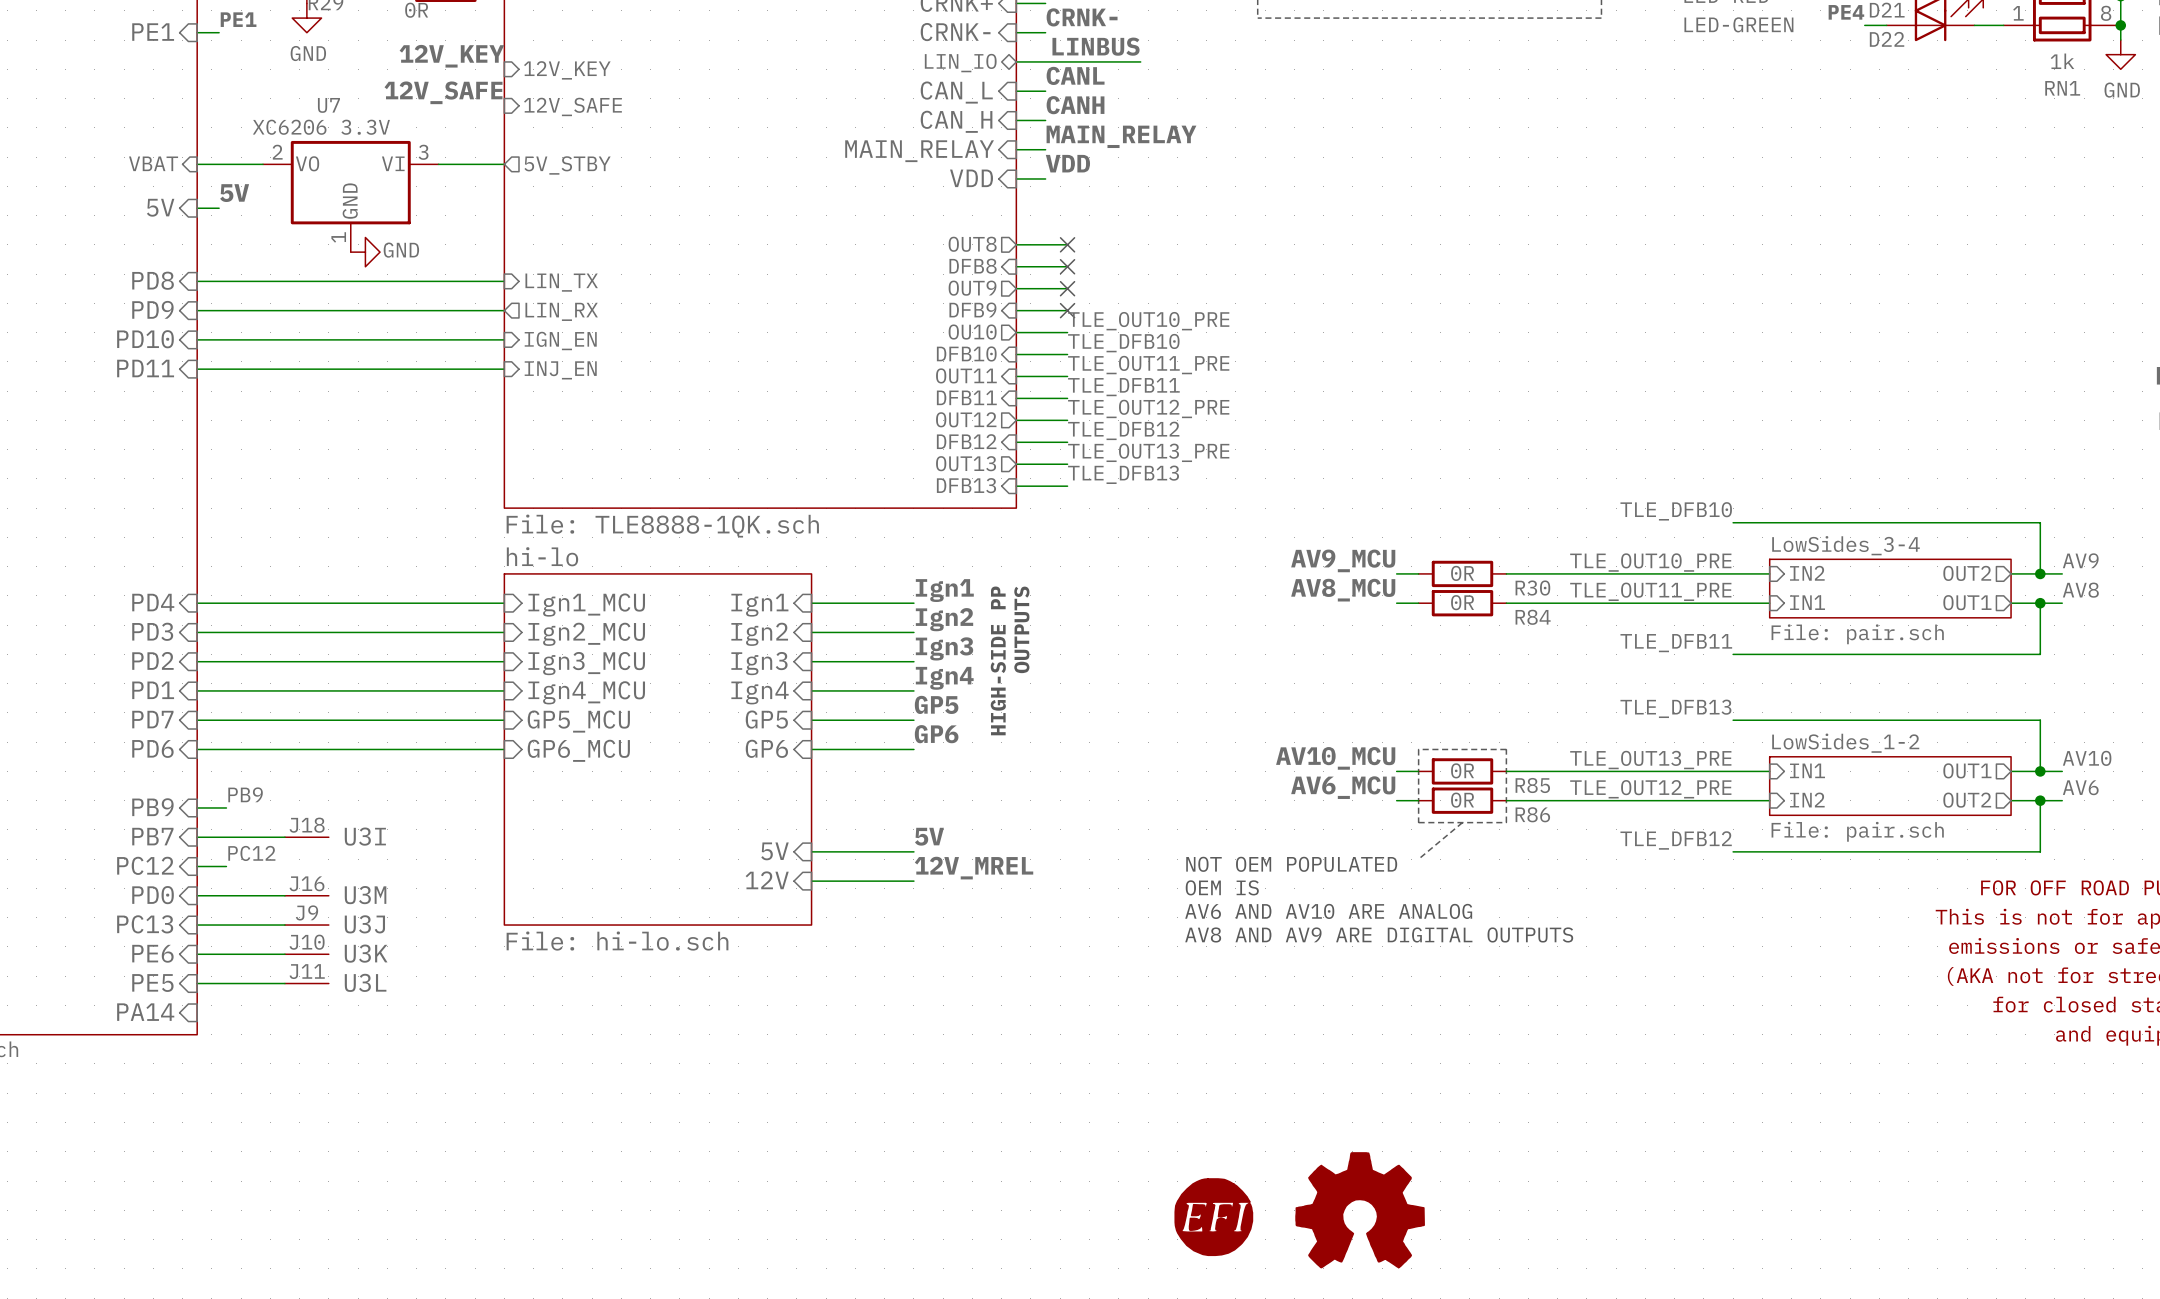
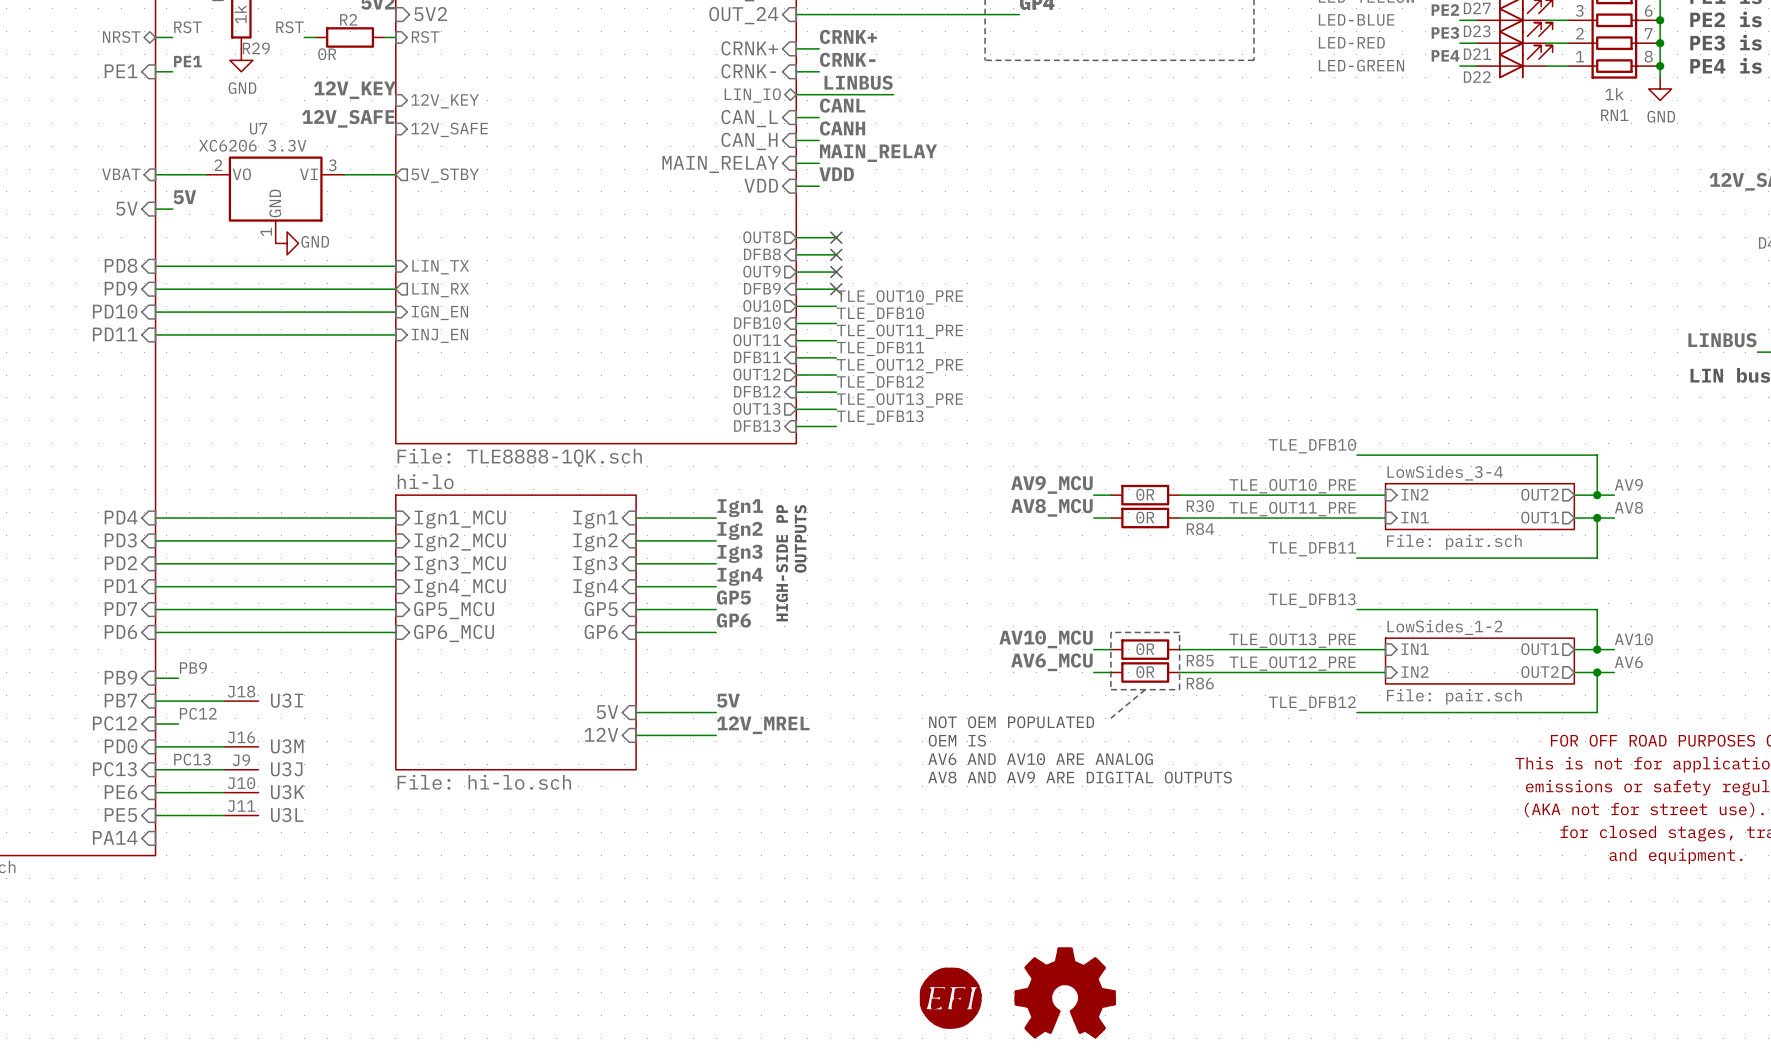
label: none -> PC13 (192, 759)

